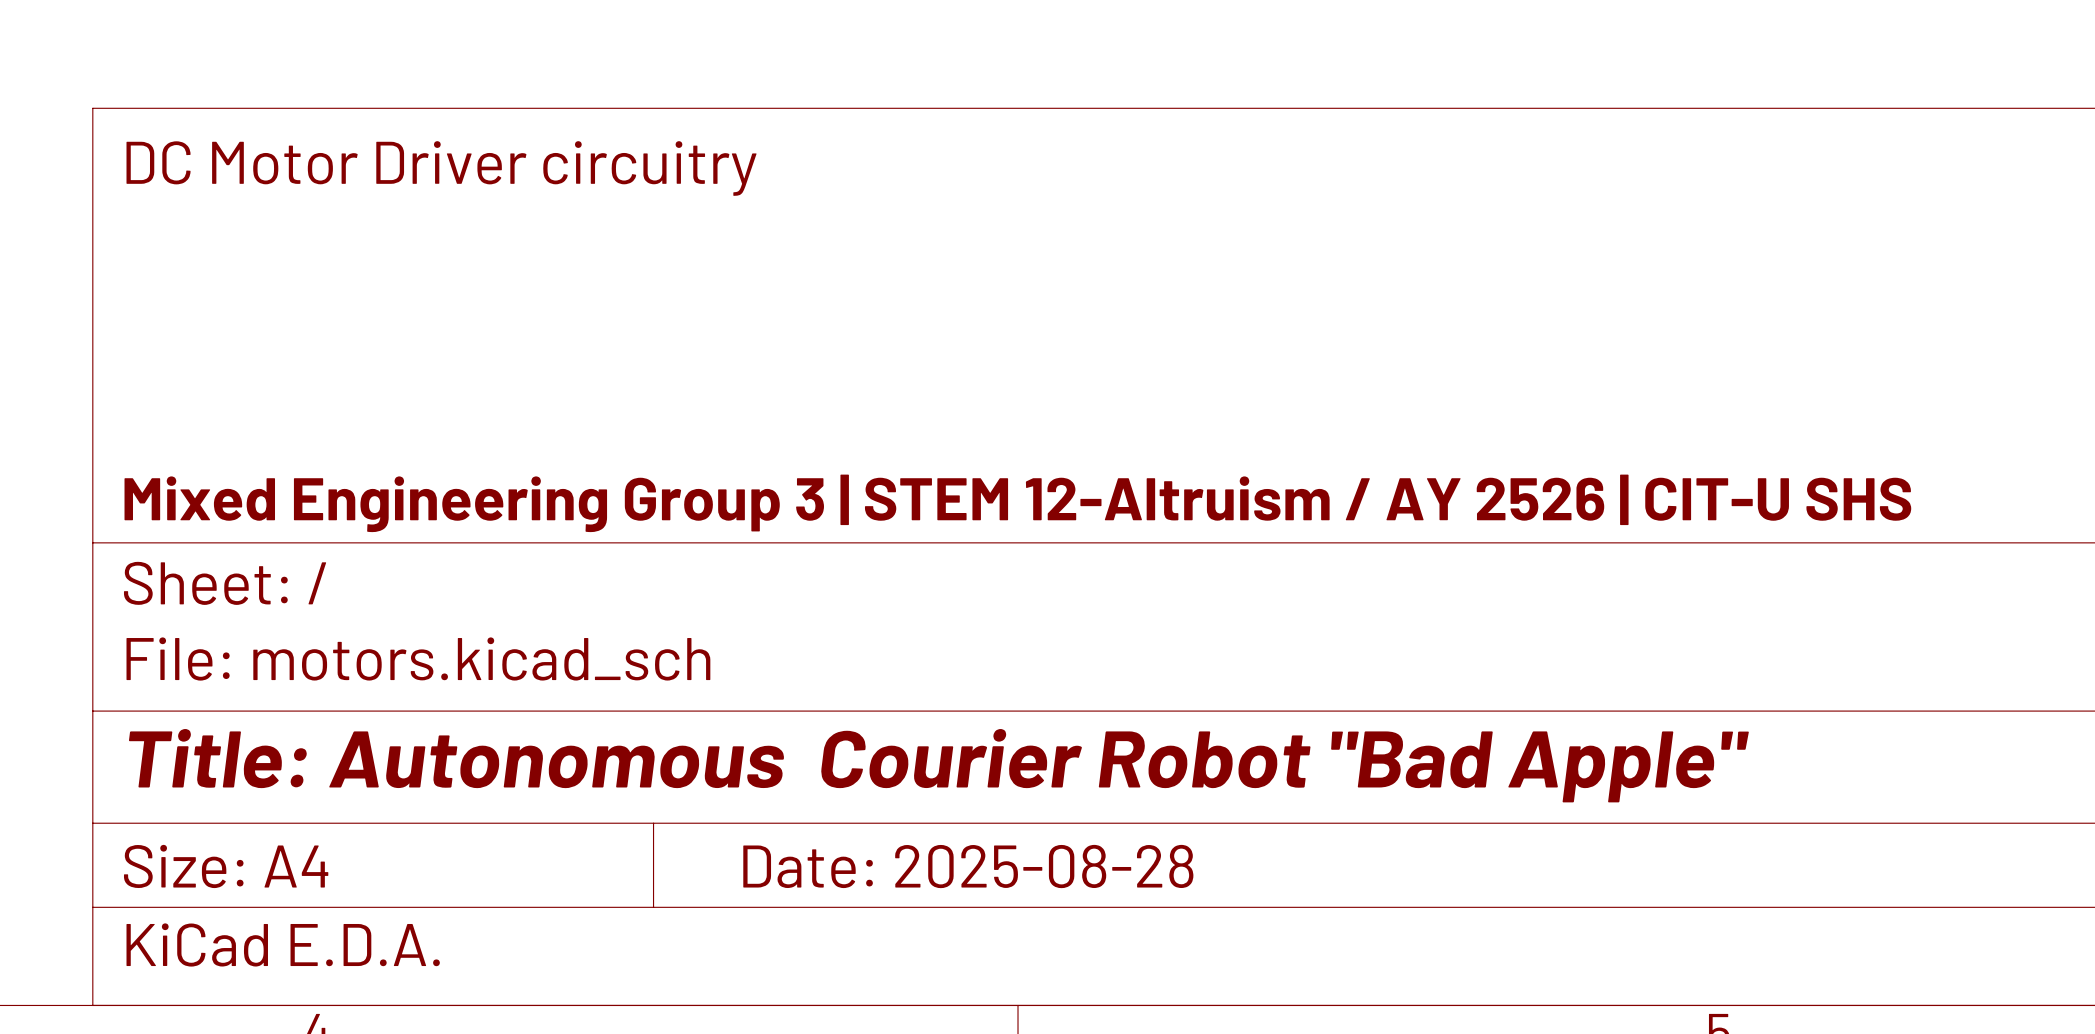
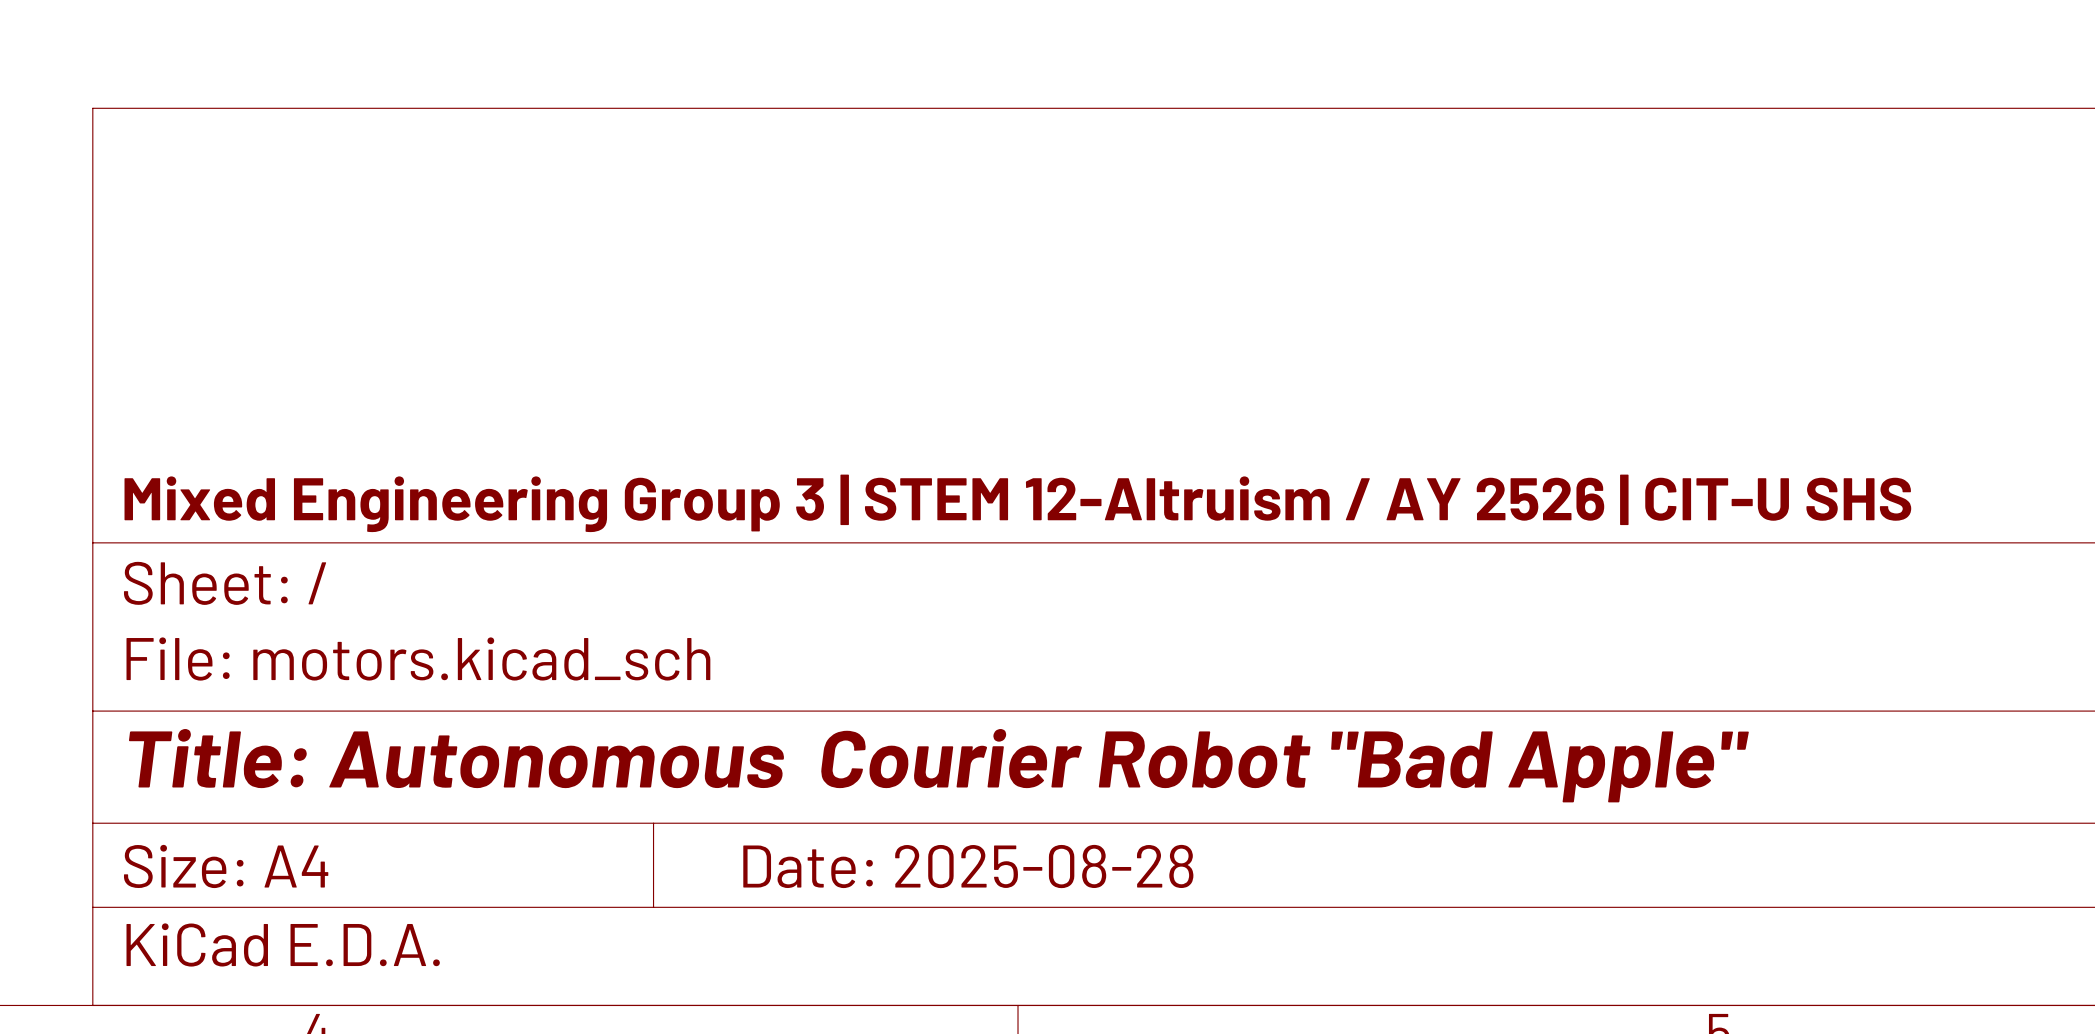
title block: DC Motor Driver circuitry (441, 168) -> none

